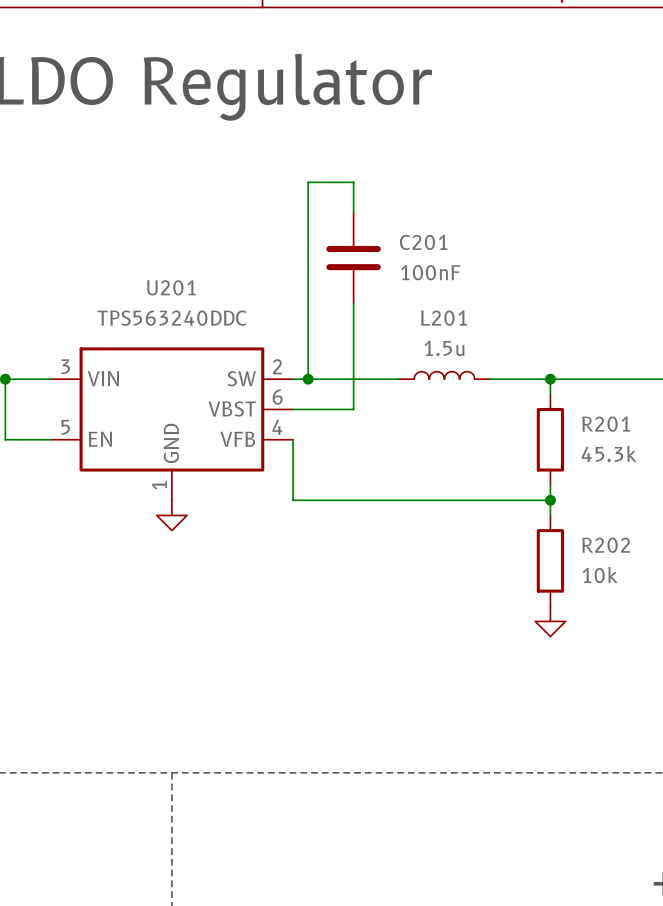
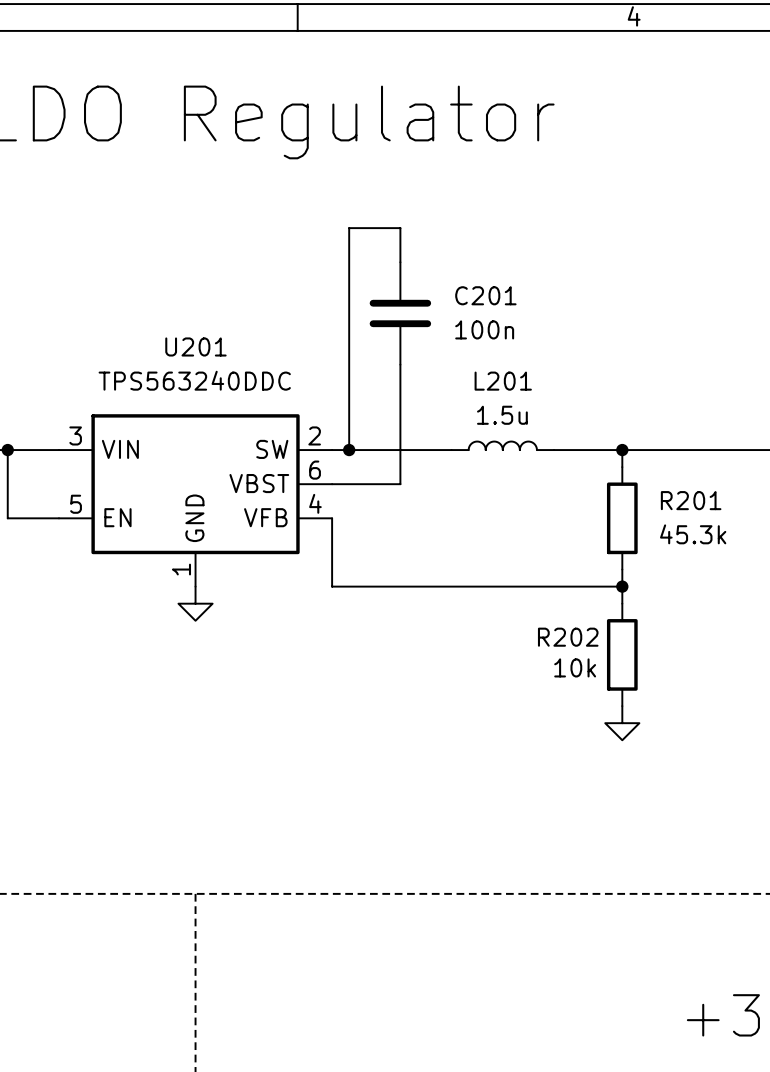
C201 value: 100nF (430, 272) -> 100n (484, 329)
R202 name position: R202 (606, 545) -> R202 (568, 637)
R202 value position: 10k (600, 575) -> 10k (575, 667)

